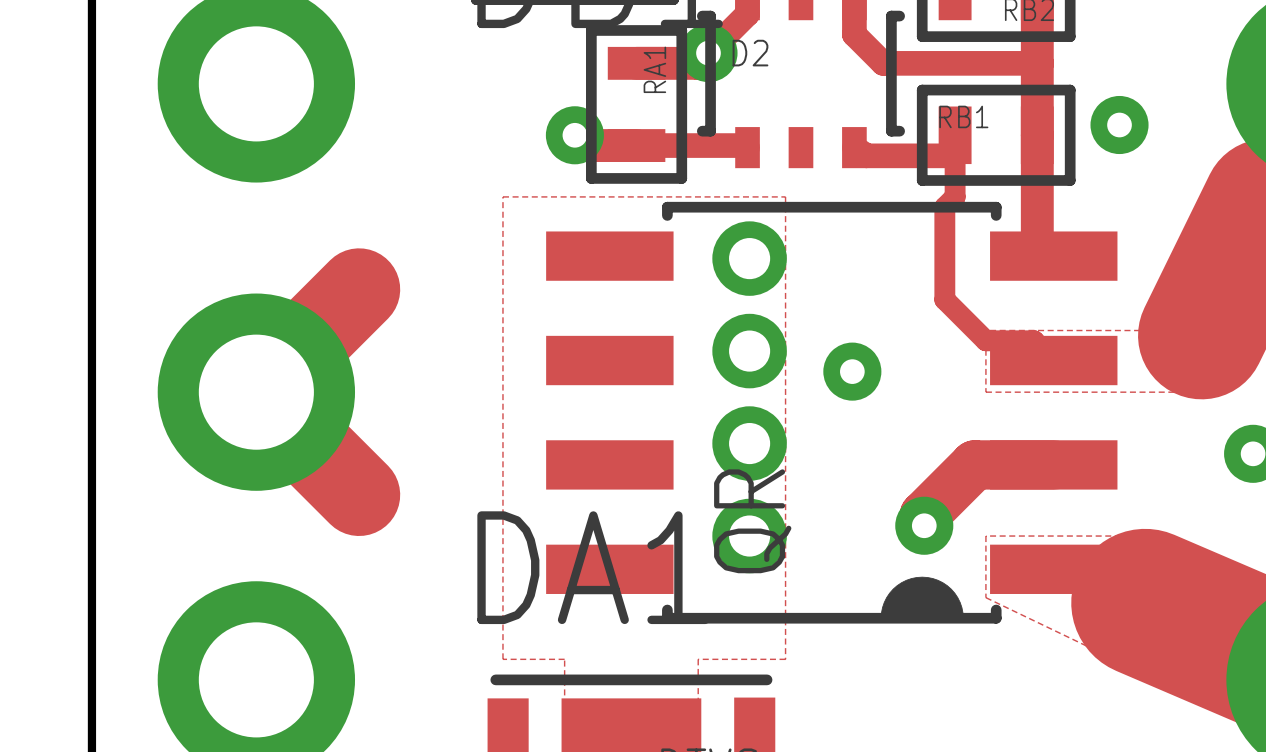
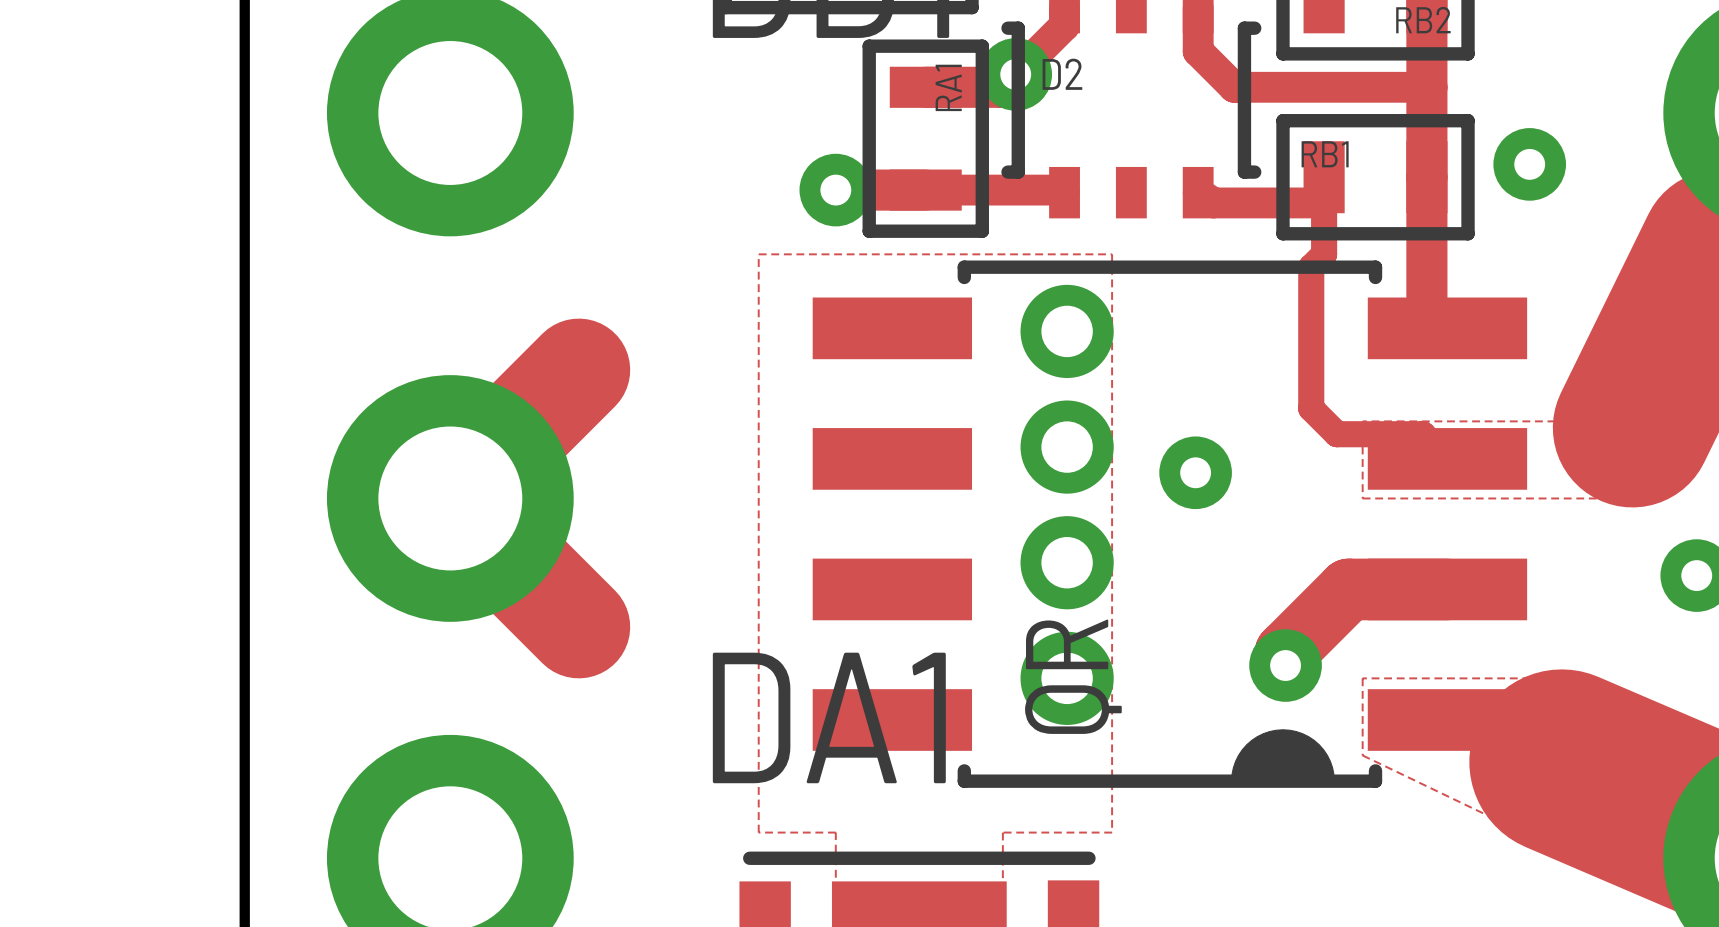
via position: (574, 135) -> (835, 190)
track: (944, 299) (985, 340) -> (1311, 382) (1311, 408) (1336, 434) (1362, 434)

